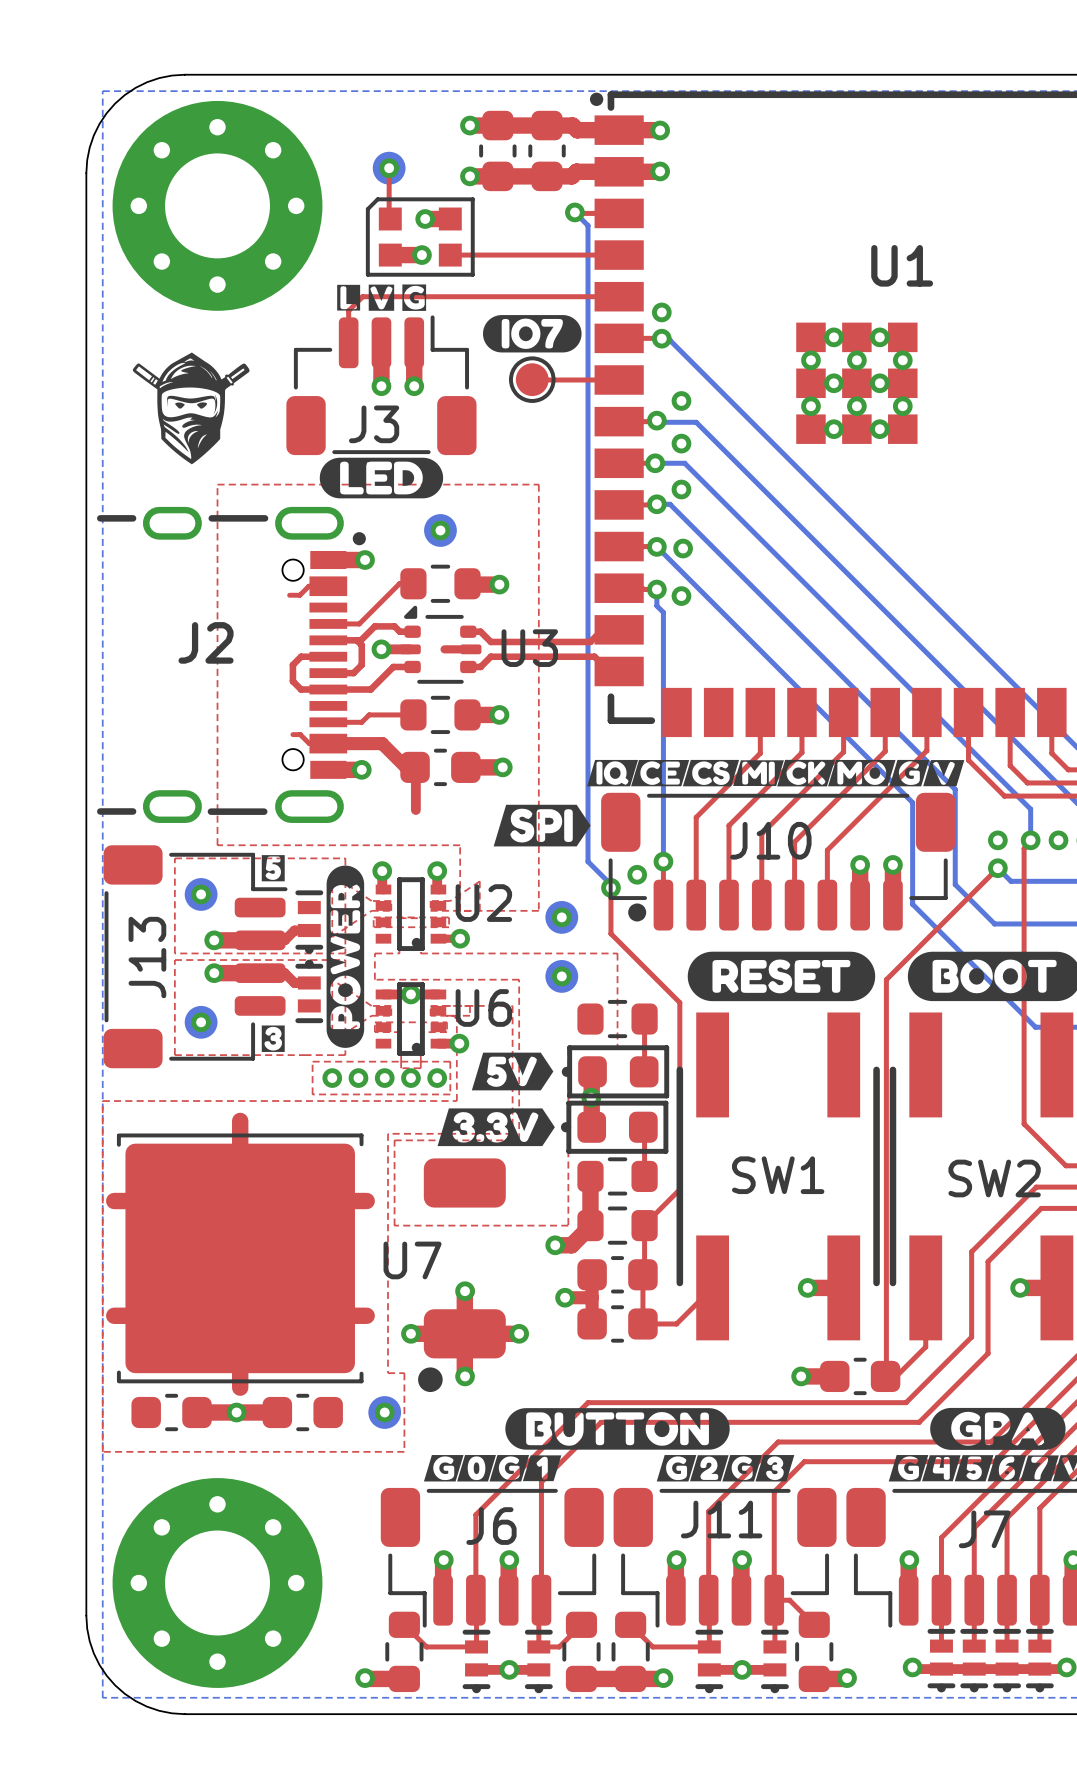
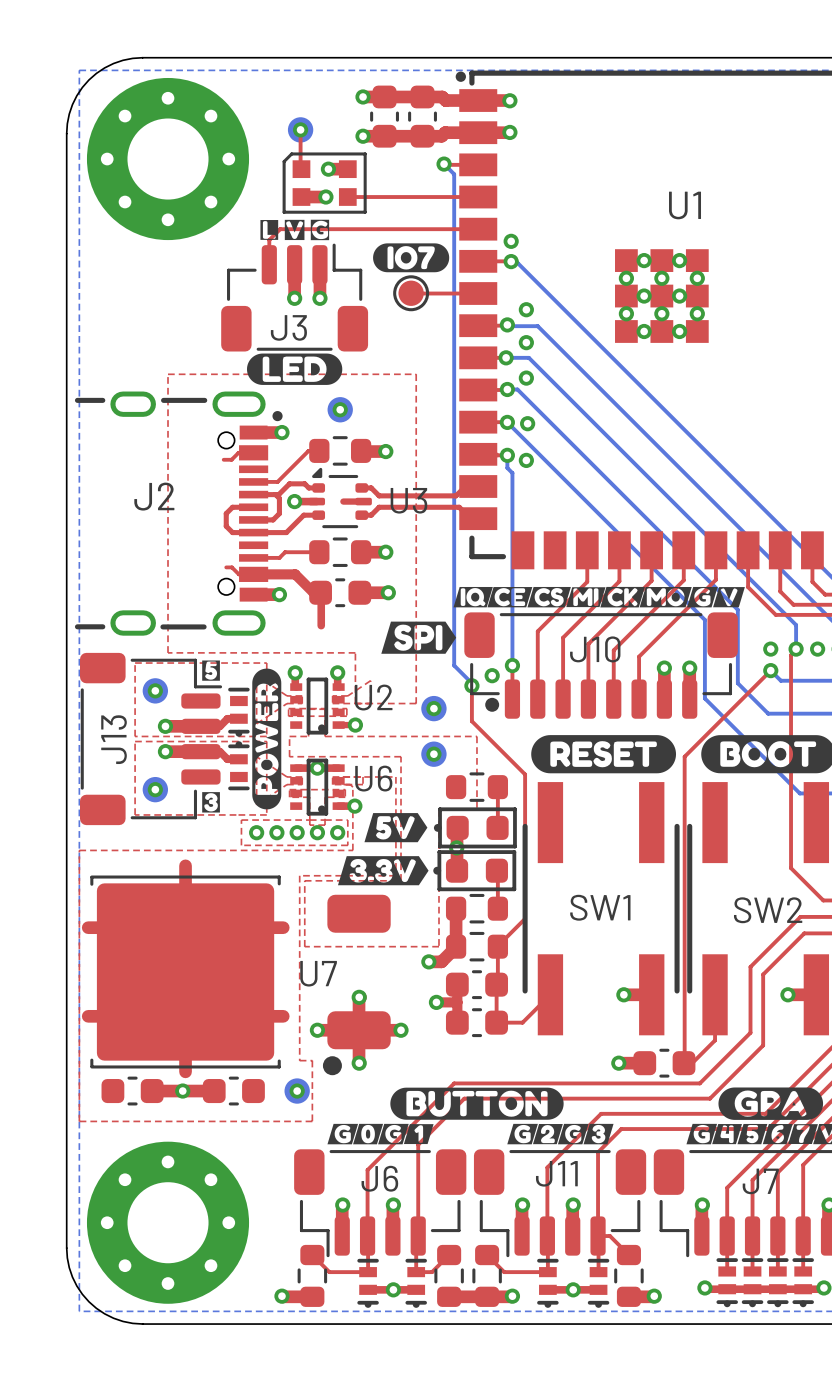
drawing: [132, 352, 250, 465] -> none

